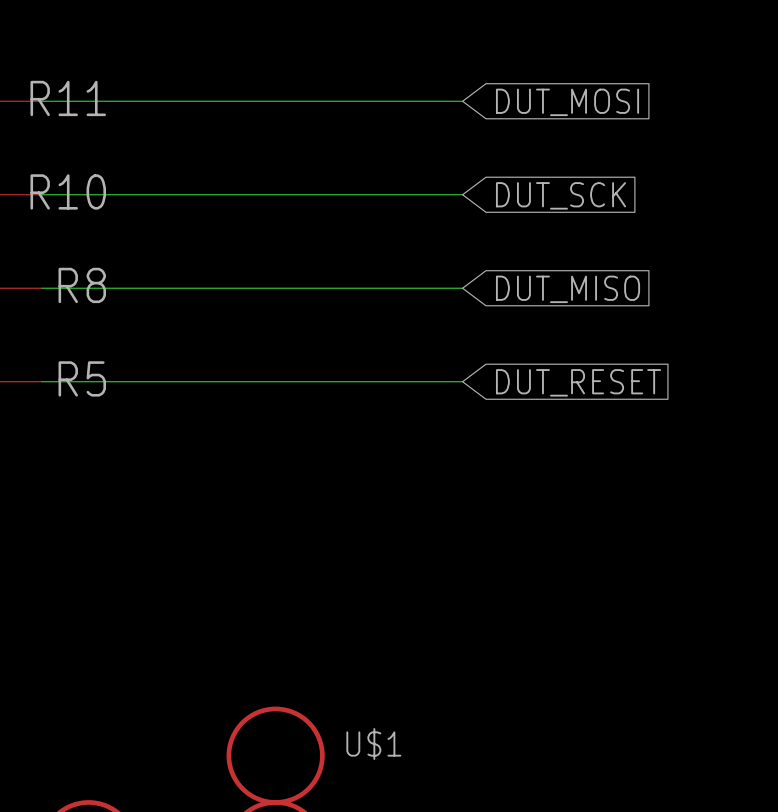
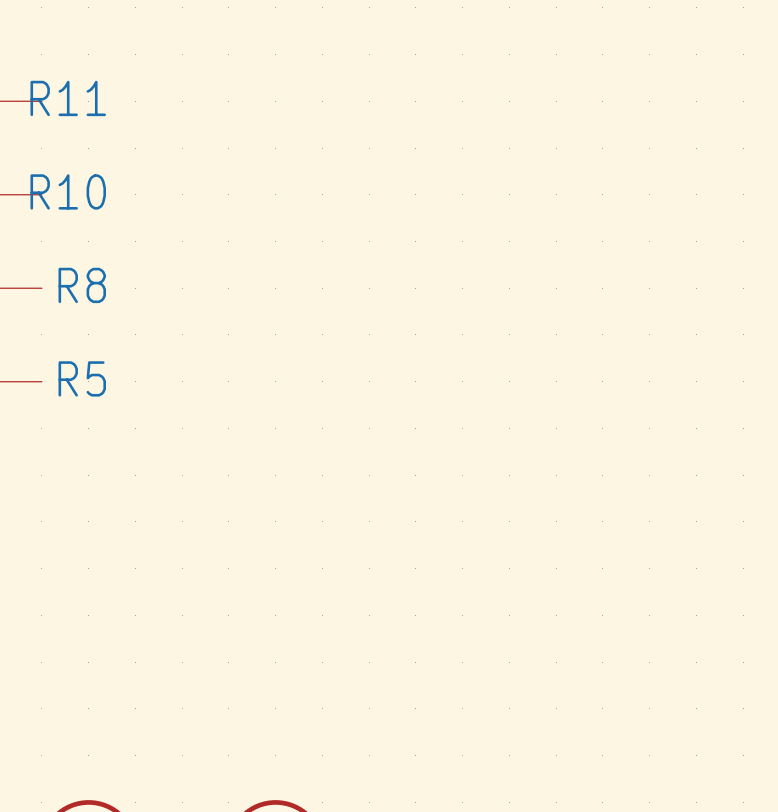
wire: (41, 101) (462, 101) -> none
global label: DUT_MOSI (567, 102) -> none
wire: (41, 194) (462, 194) -> none
global label: DUT_SCK (561, 195) -> none
wire: (41, 288) (462, 288) -> none
global label: DUT_MISO (568, 289) -> none
wire: (41, 381) (462, 381) -> none
global label: DUT_RESET (578, 382) -> none
U$1: (275, 755) -> none

